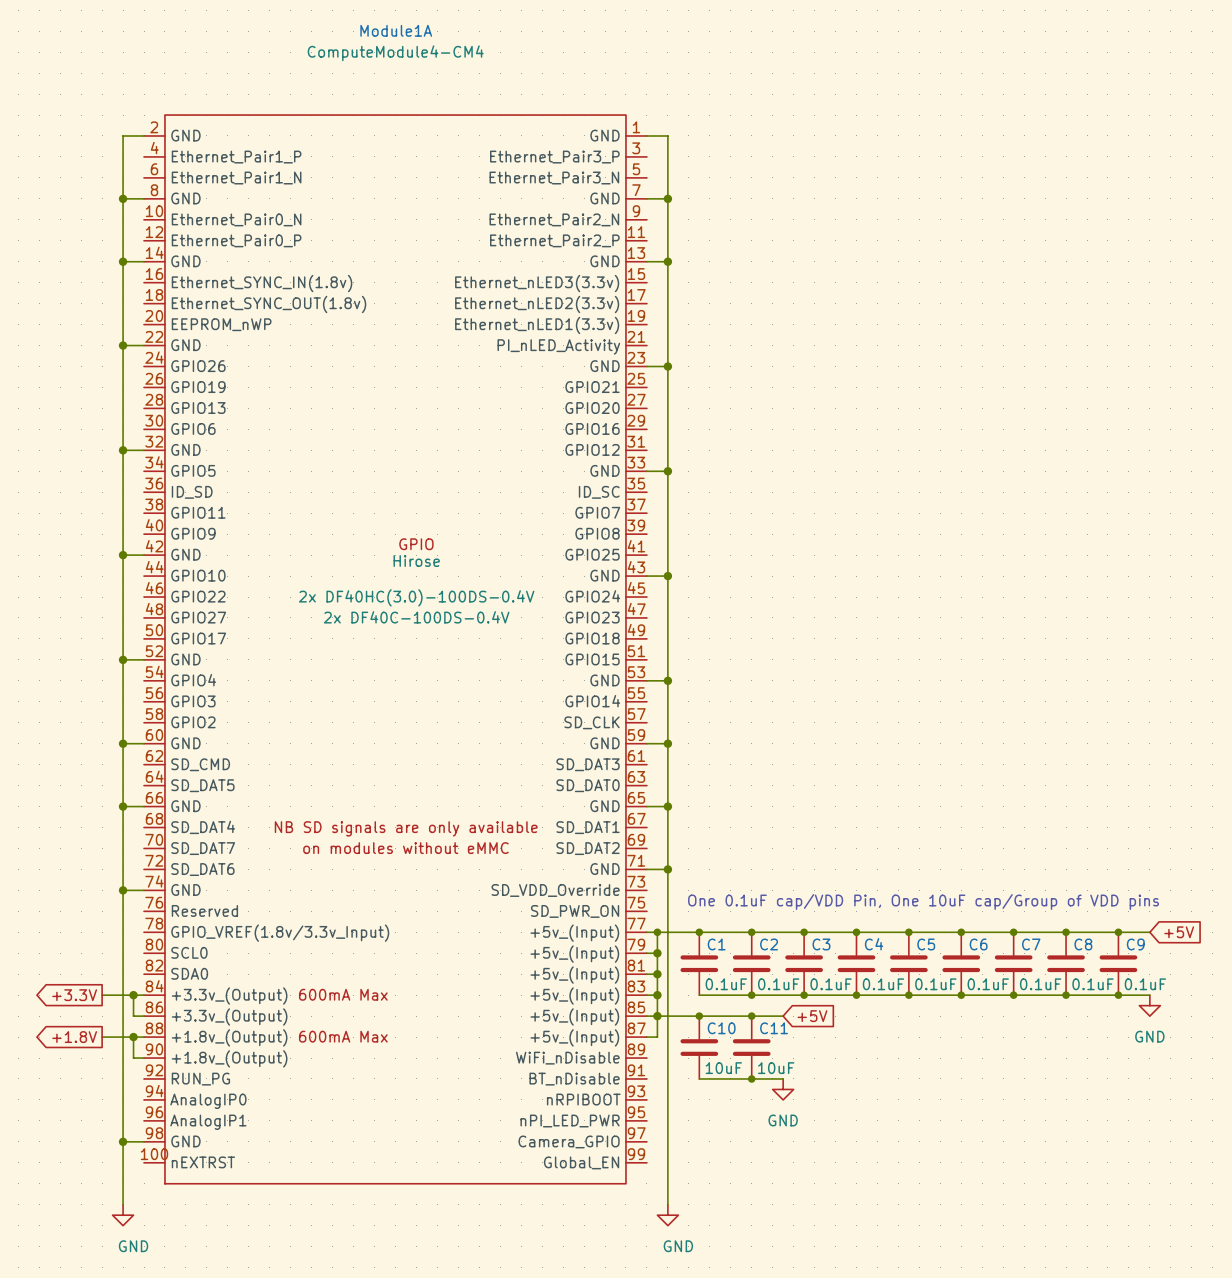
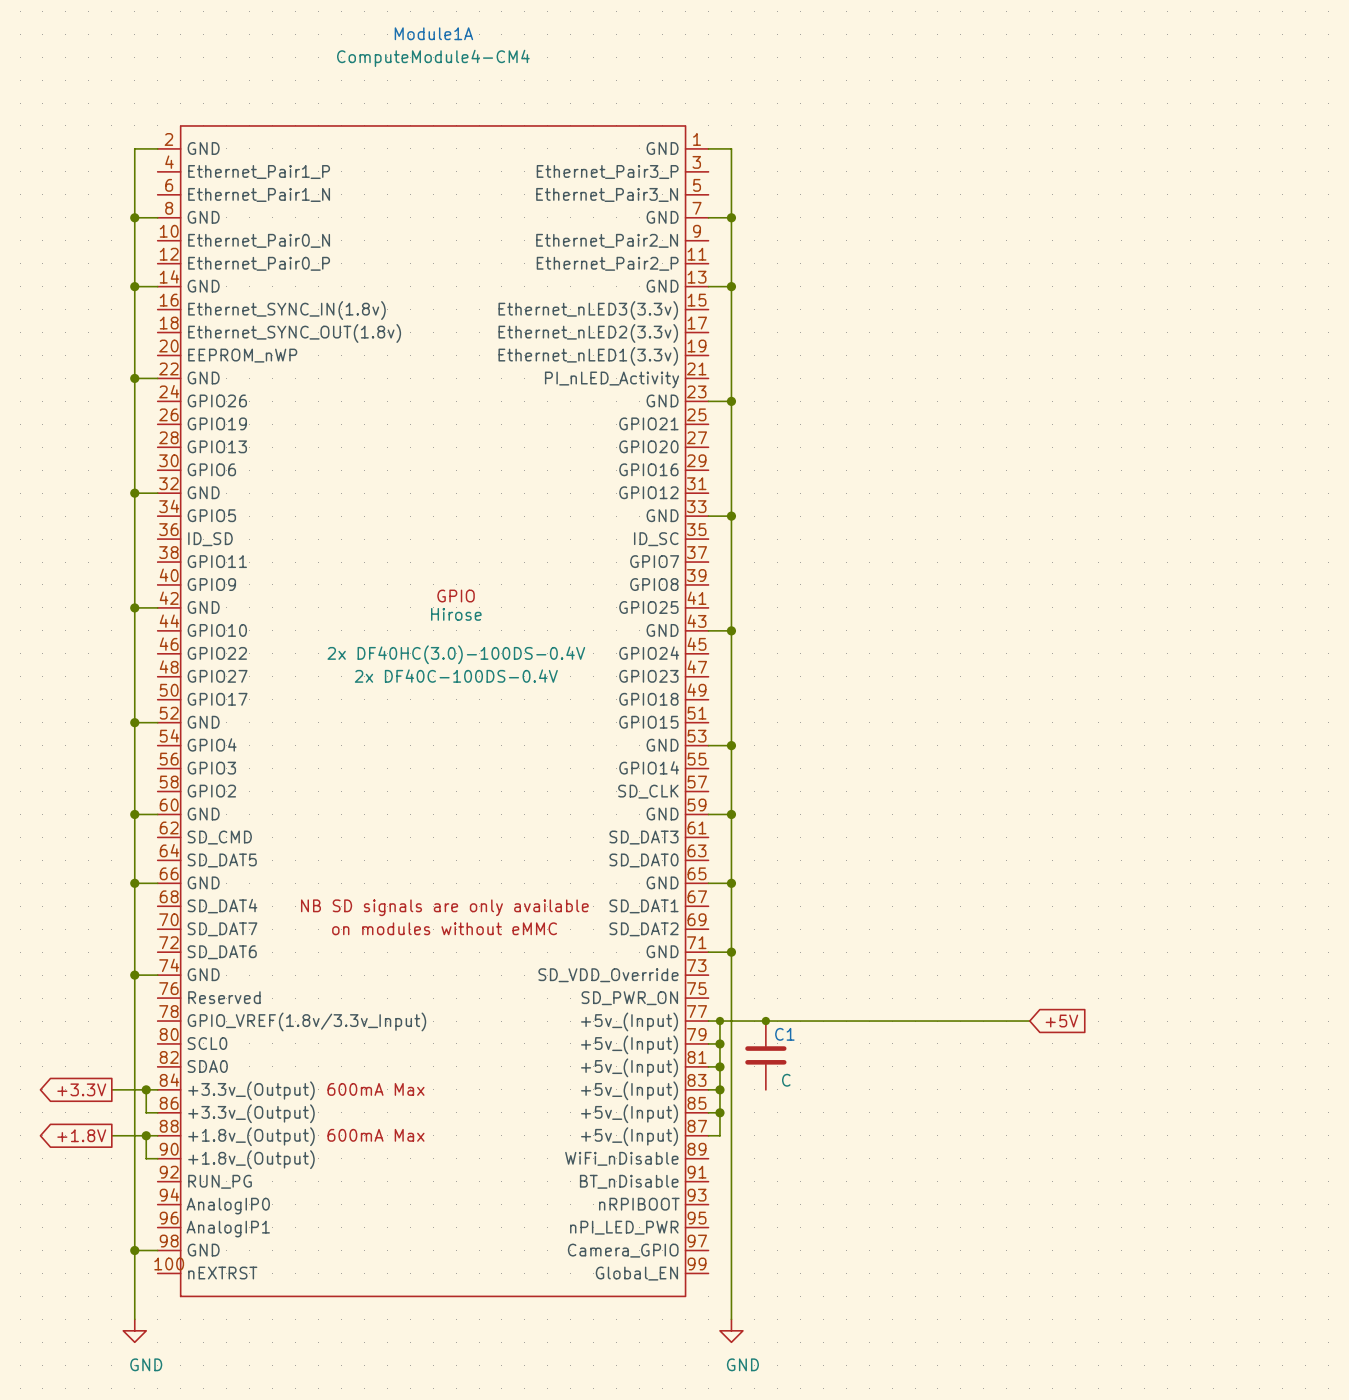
text: One 0.1uF cap/VDD Pin, One 10uF cap/Group of VDD pins (923, 902) -> none
junction: (751, 932) -> none
junction: (804, 932) -> none
junction: (856, 932) -> none
junction: (908, 932) -> none
wire: (940, 932) (1149, 932) -> none
junction: (961, 932) -> none
global label: none -> +5V (1061, 1021)
junction: (1013, 932) -> none
junction: (1066, 932) -> none
junction: (1118, 932) -> none
global label: +5V (1179, 932) -> none
C2: 0.1uF (751, 963) -> none
C3: 0.1uF (804, 963) -> none
C4: 0.1uF (856, 963) -> none
C5: 0.1uF (908, 963) -> none
C6: 0.1uF (961, 963) -> none
C7: 0.1uF (1013, 963) -> none
C8: 0.1uF (1066, 963) -> none
C9: 0.1uF (1118, 963) -> none
C1 value: 0.1uF (726, 984) -> C (786, 1080)
wire: (699, 995) (1149, 995) -> none
junction: (751, 995) -> none
junction: (804, 995) -> none
junction: (856, 995) -> none
junction: (908, 995) -> none
junction: (961, 995) -> none
junction: (1013, 995) -> none
junction: (1066, 995) -> none
junction: (1118, 995) -> none
power symbol: GND (1149, 1005) -> none
wire: (657, 1016) (783, 1016) -> none
junction: (699, 1016) -> none
junction: (751, 1016) -> none
global label: +5V (812, 1016) -> none
C10: 10uF (699, 1047) -> none
C11: 10uF (751, 1047) -> none
wire: (699, 1078) (783, 1078) -> none
junction: (751, 1078) -> none
power symbol: GND (783, 1089) -> none

